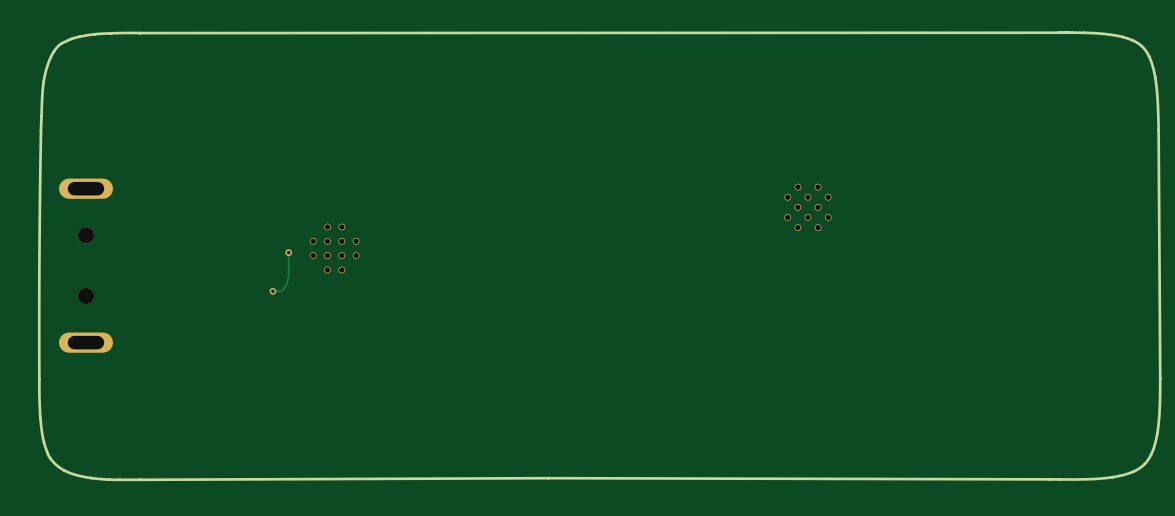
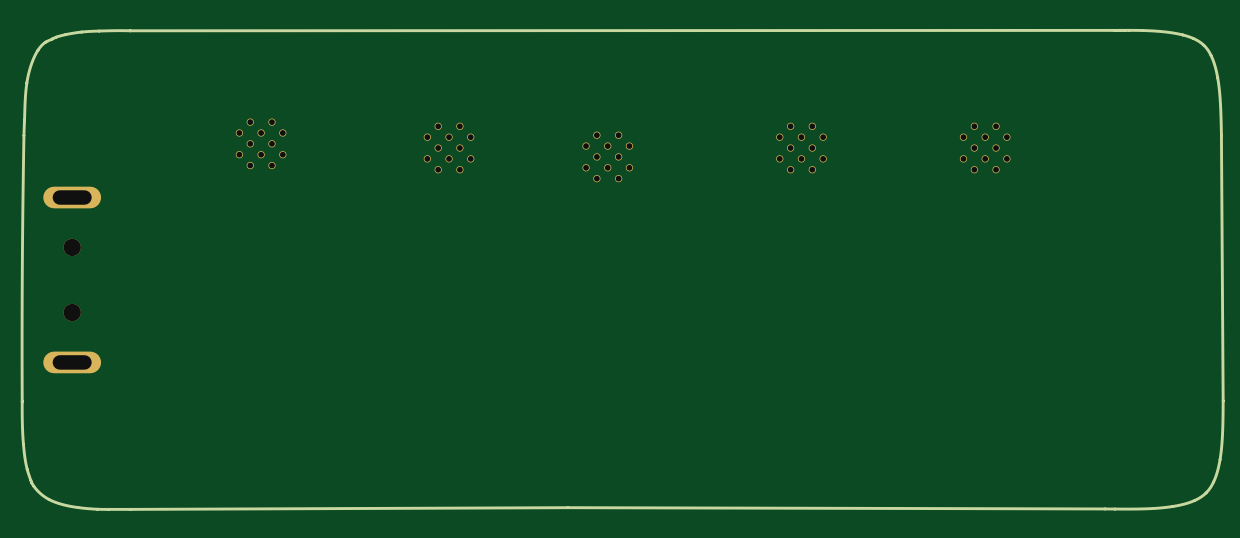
part: none -> (261, 143)
part: none -> (449, 148)
part: none -> (801, 148)
part: none -> (985, 148)
part: none -> (607, 156)
part: (807, 207) -> none
part: (334, 248) -> none
track: (288, 252) (286, 283) (281, 291) (272, 291) -> none
via: (288, 252) -> none
via: (272, 291) -> none

